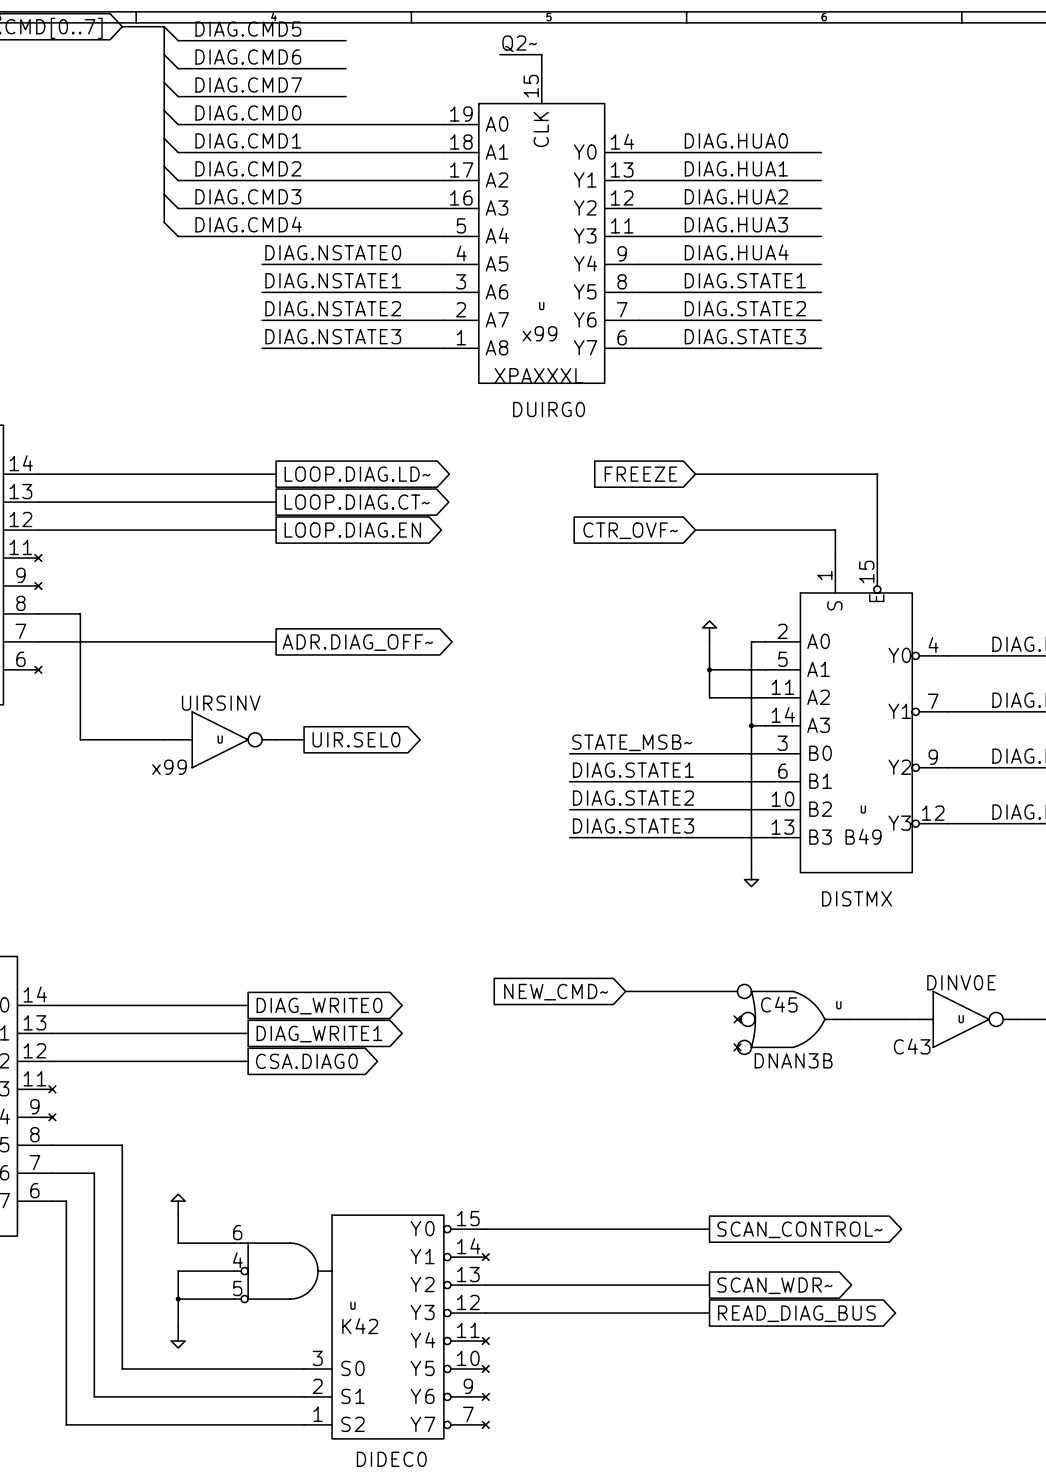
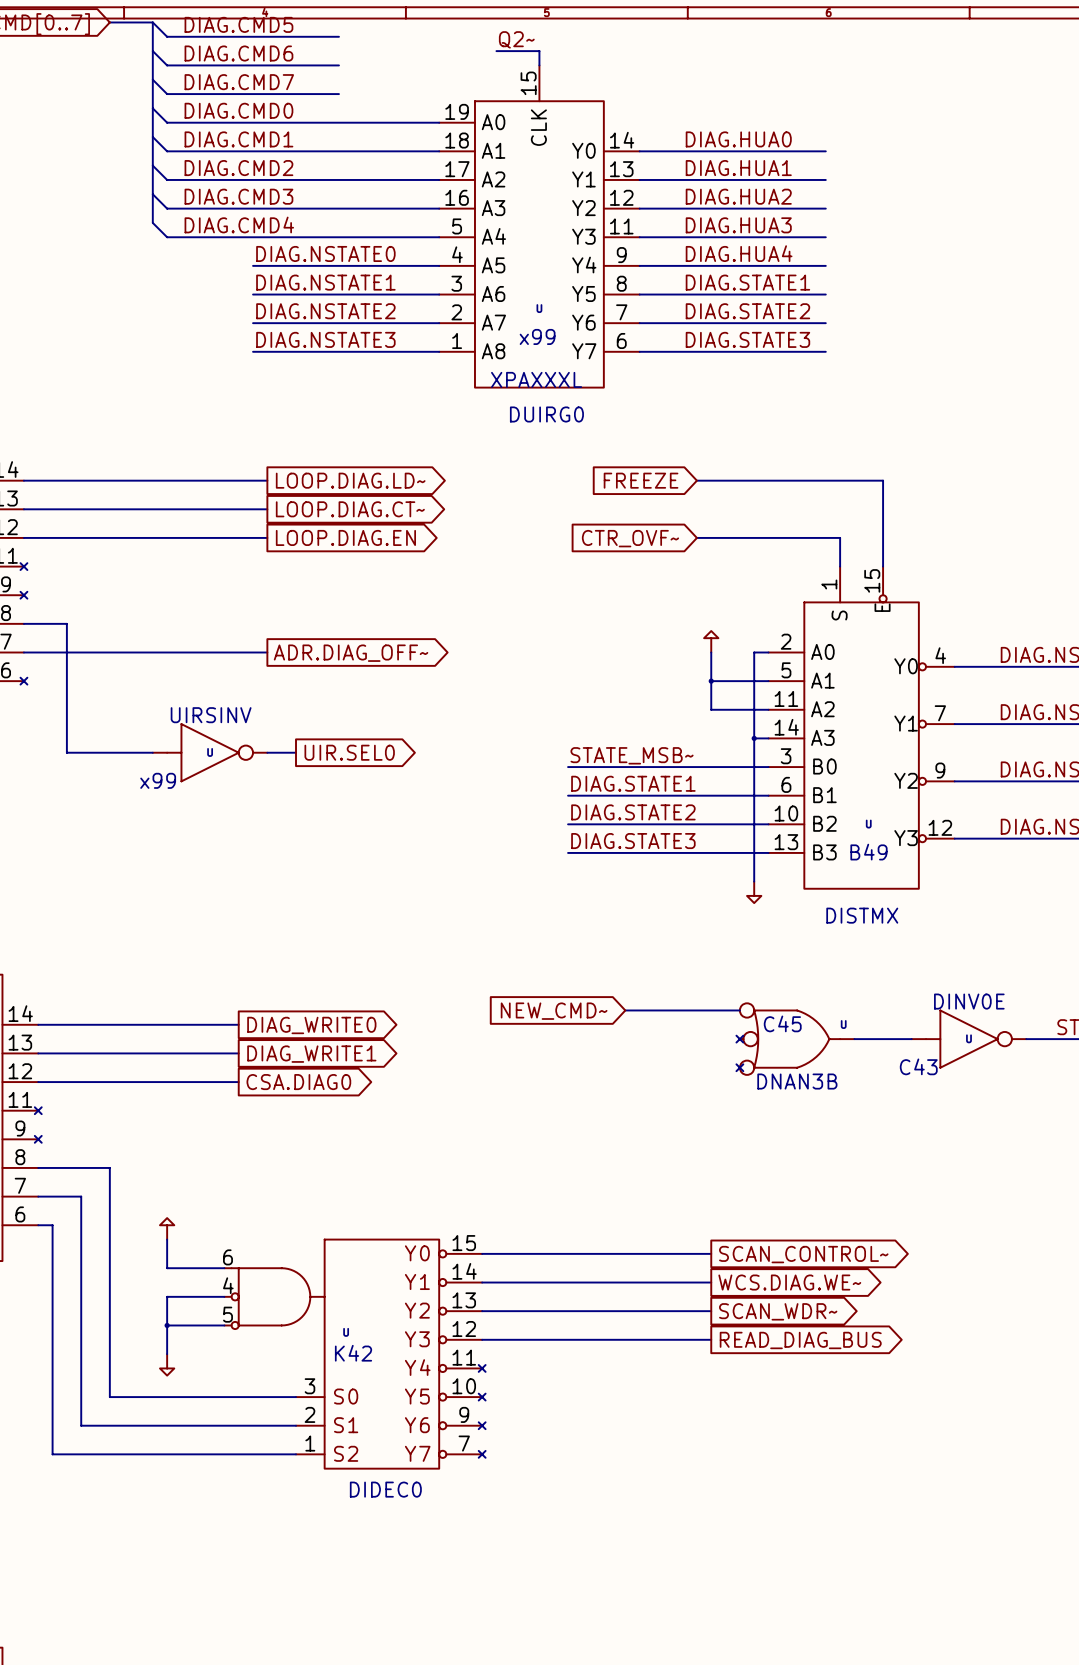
wire: none -> (482, 1282) (711, 1282)
no-connect mark: (485, 1257) -> none
global label: none -> WCS.DIAG.WE~ (789, 1282)

